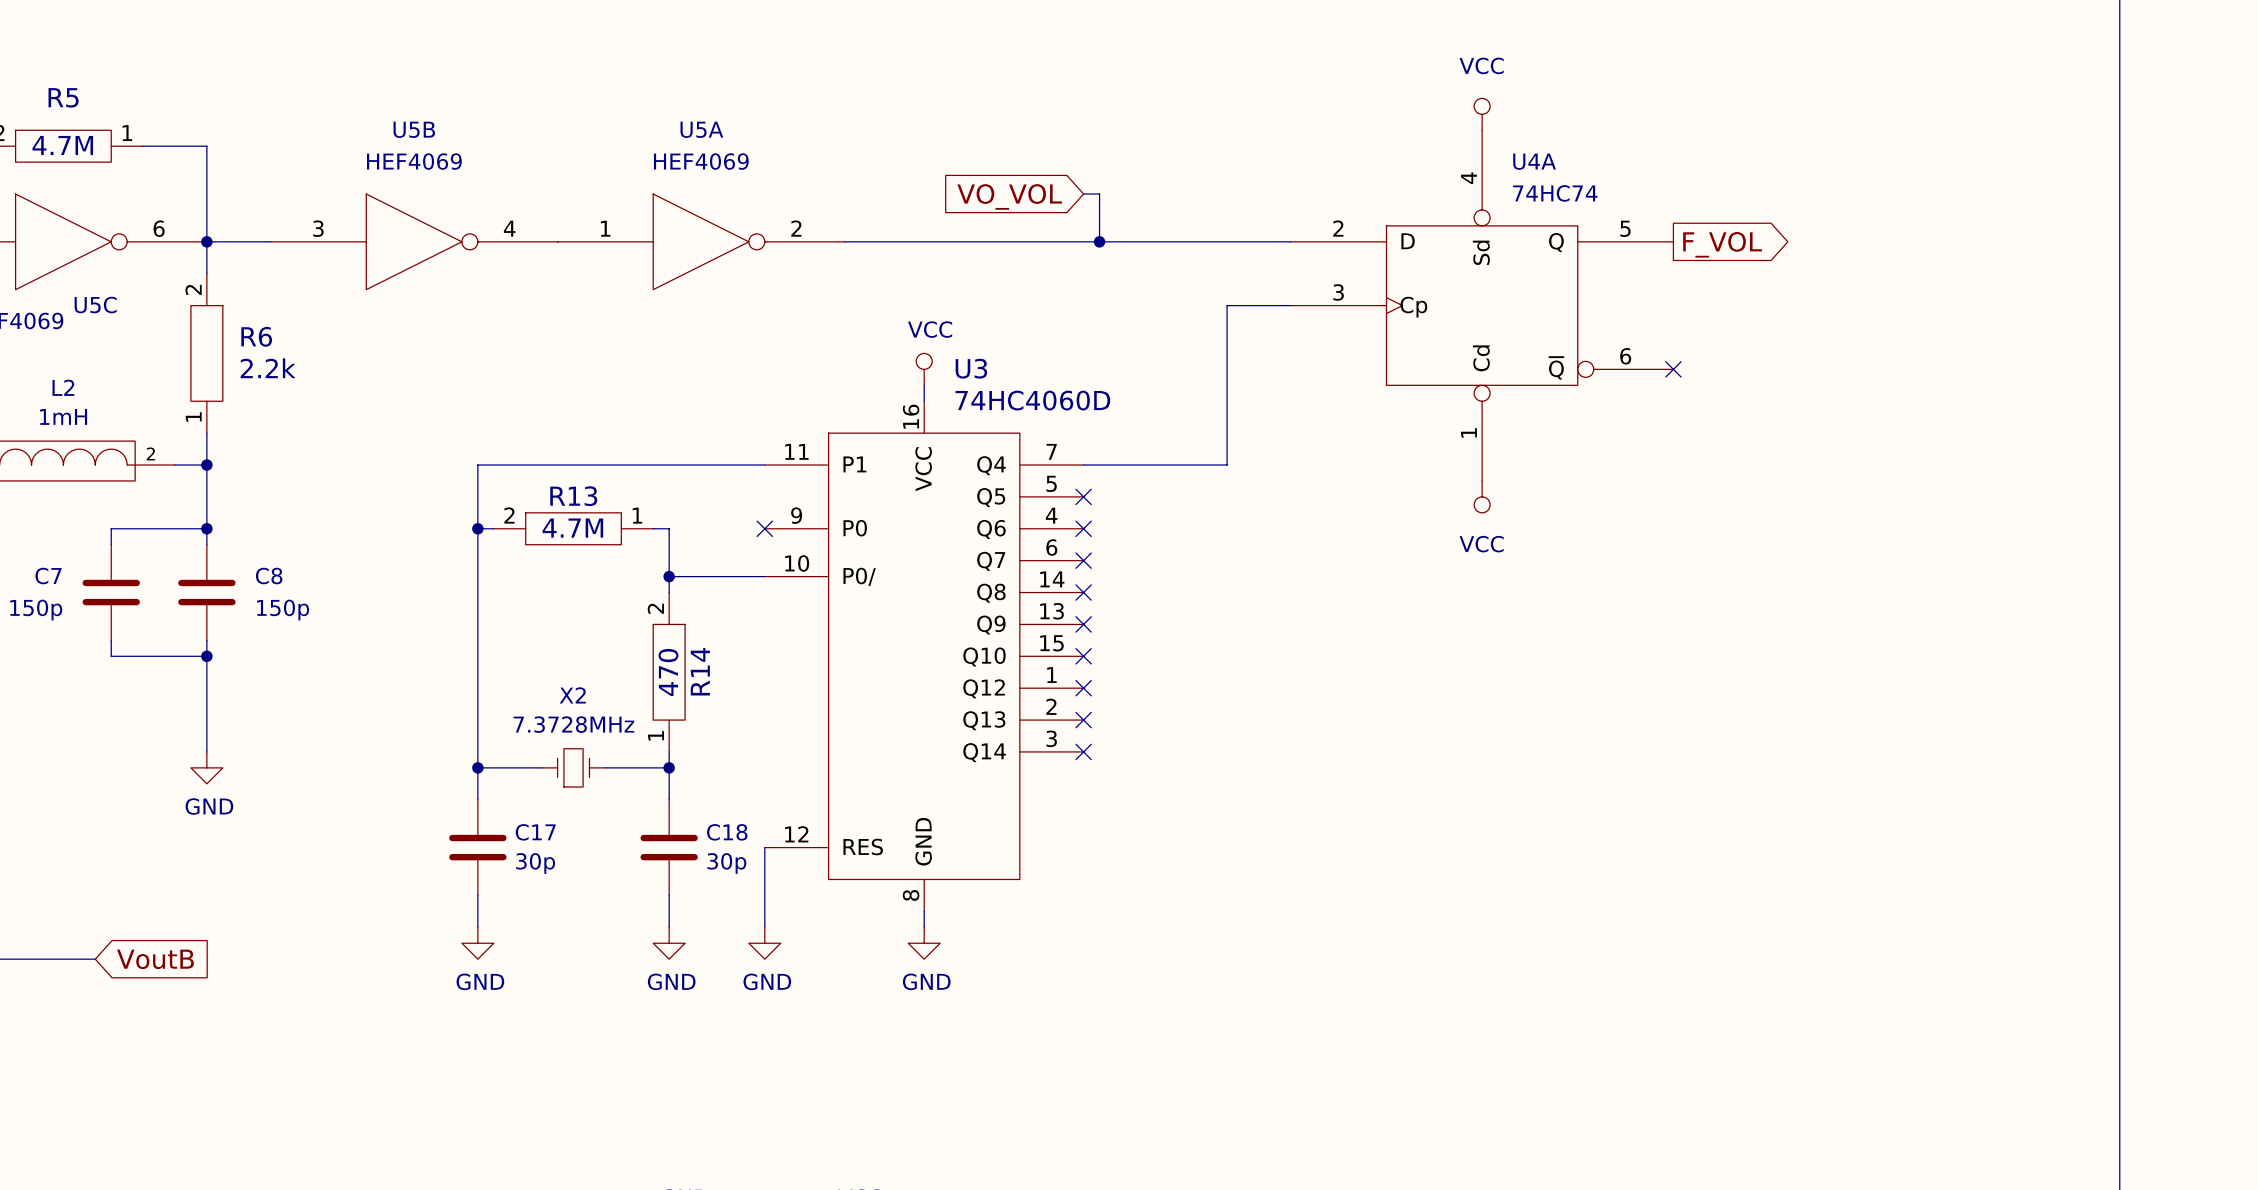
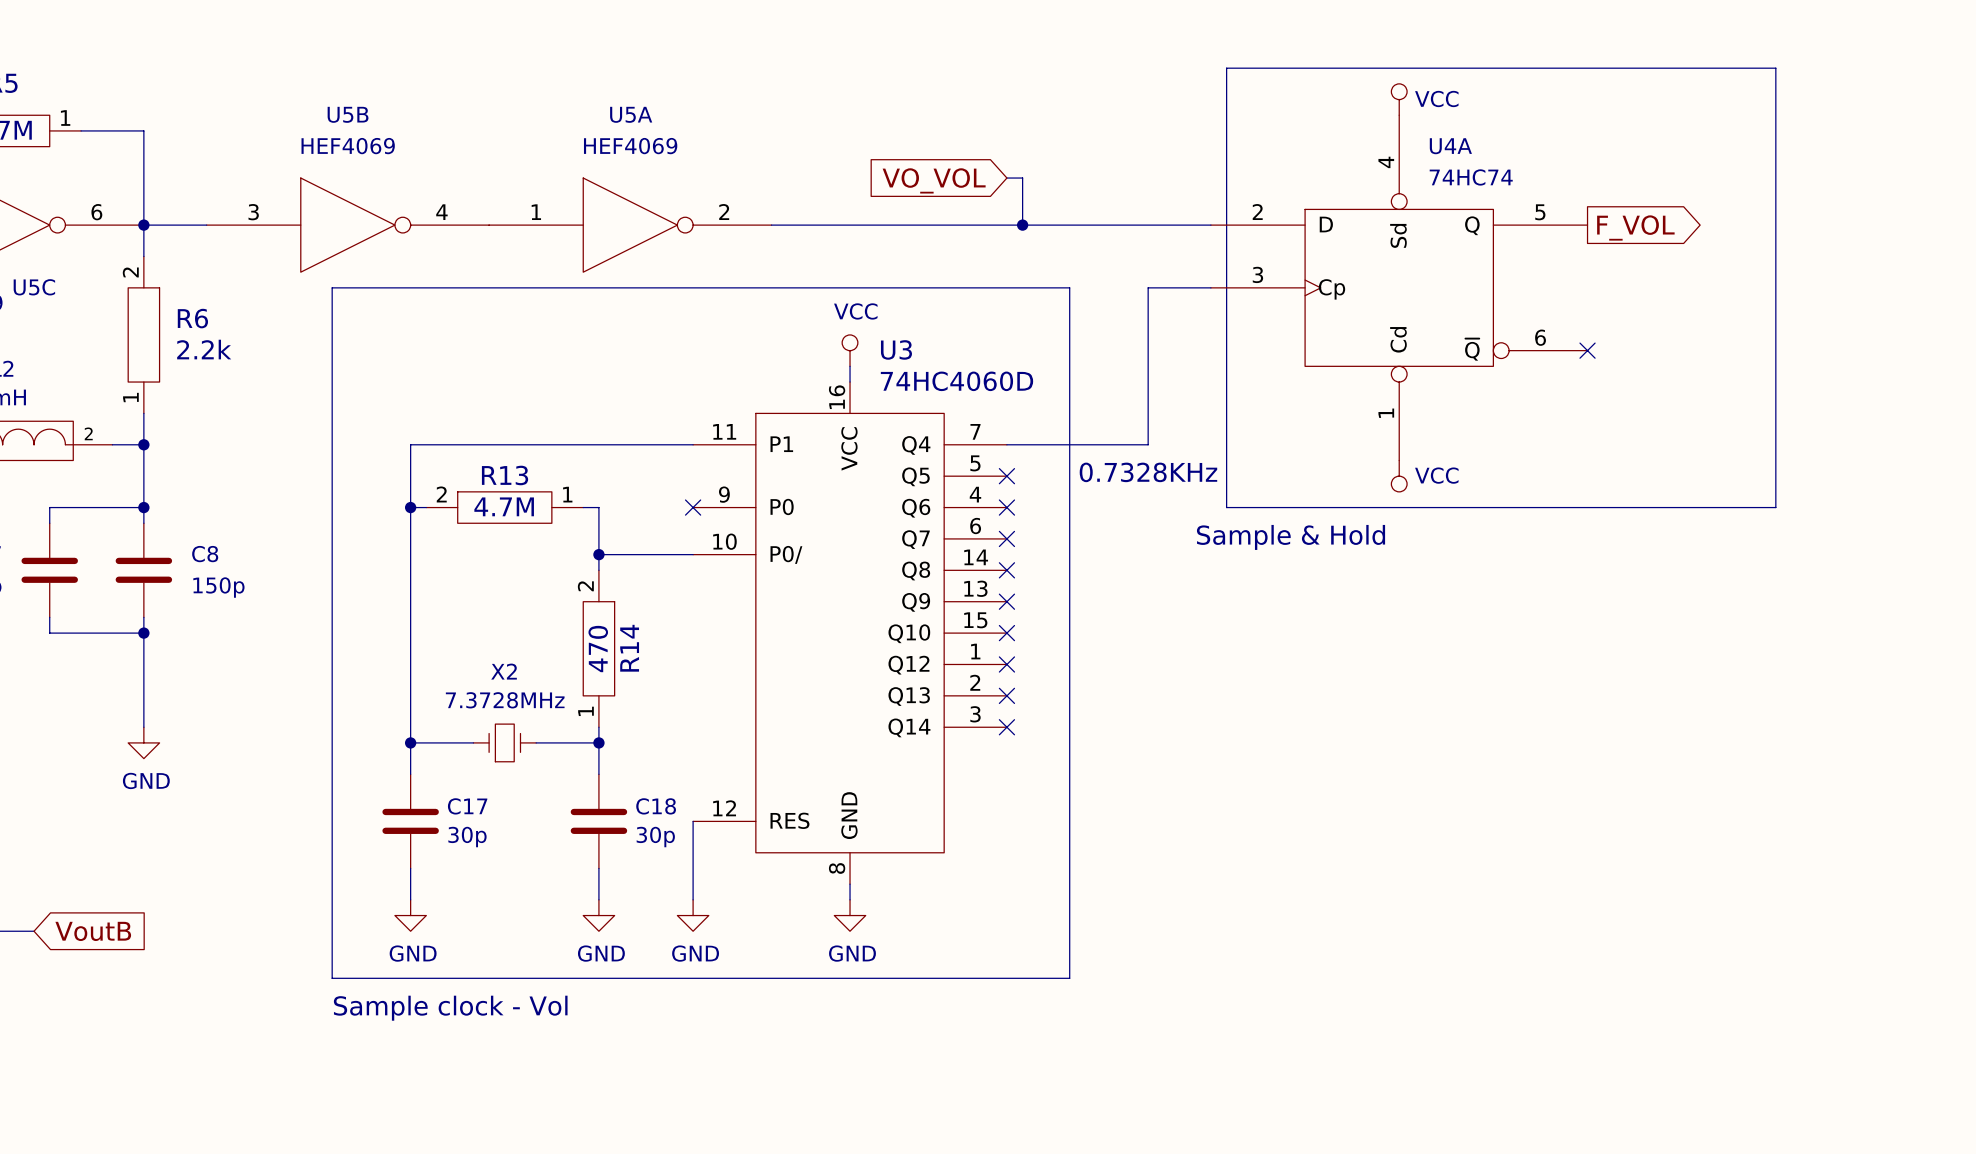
power symbol text position: VCC (1481, 65) -> VCC (1436, 98)
line: none -> (1226, 68) (1775, 68) (1775, 507) (1226, 507) (1226, 68)
line: none -> (332, 287) (1069, 287) (1069, 978) (332, 978) (332, 287)
text: none -> 0.7328KHz (1148, 472)
power symbol text position: VCC (1481, 544) -> VCC (1436, 475)
text: none -> Sample & Hold (1291, 537)
text: none -> Sample clock - Vol (450, 1008)

